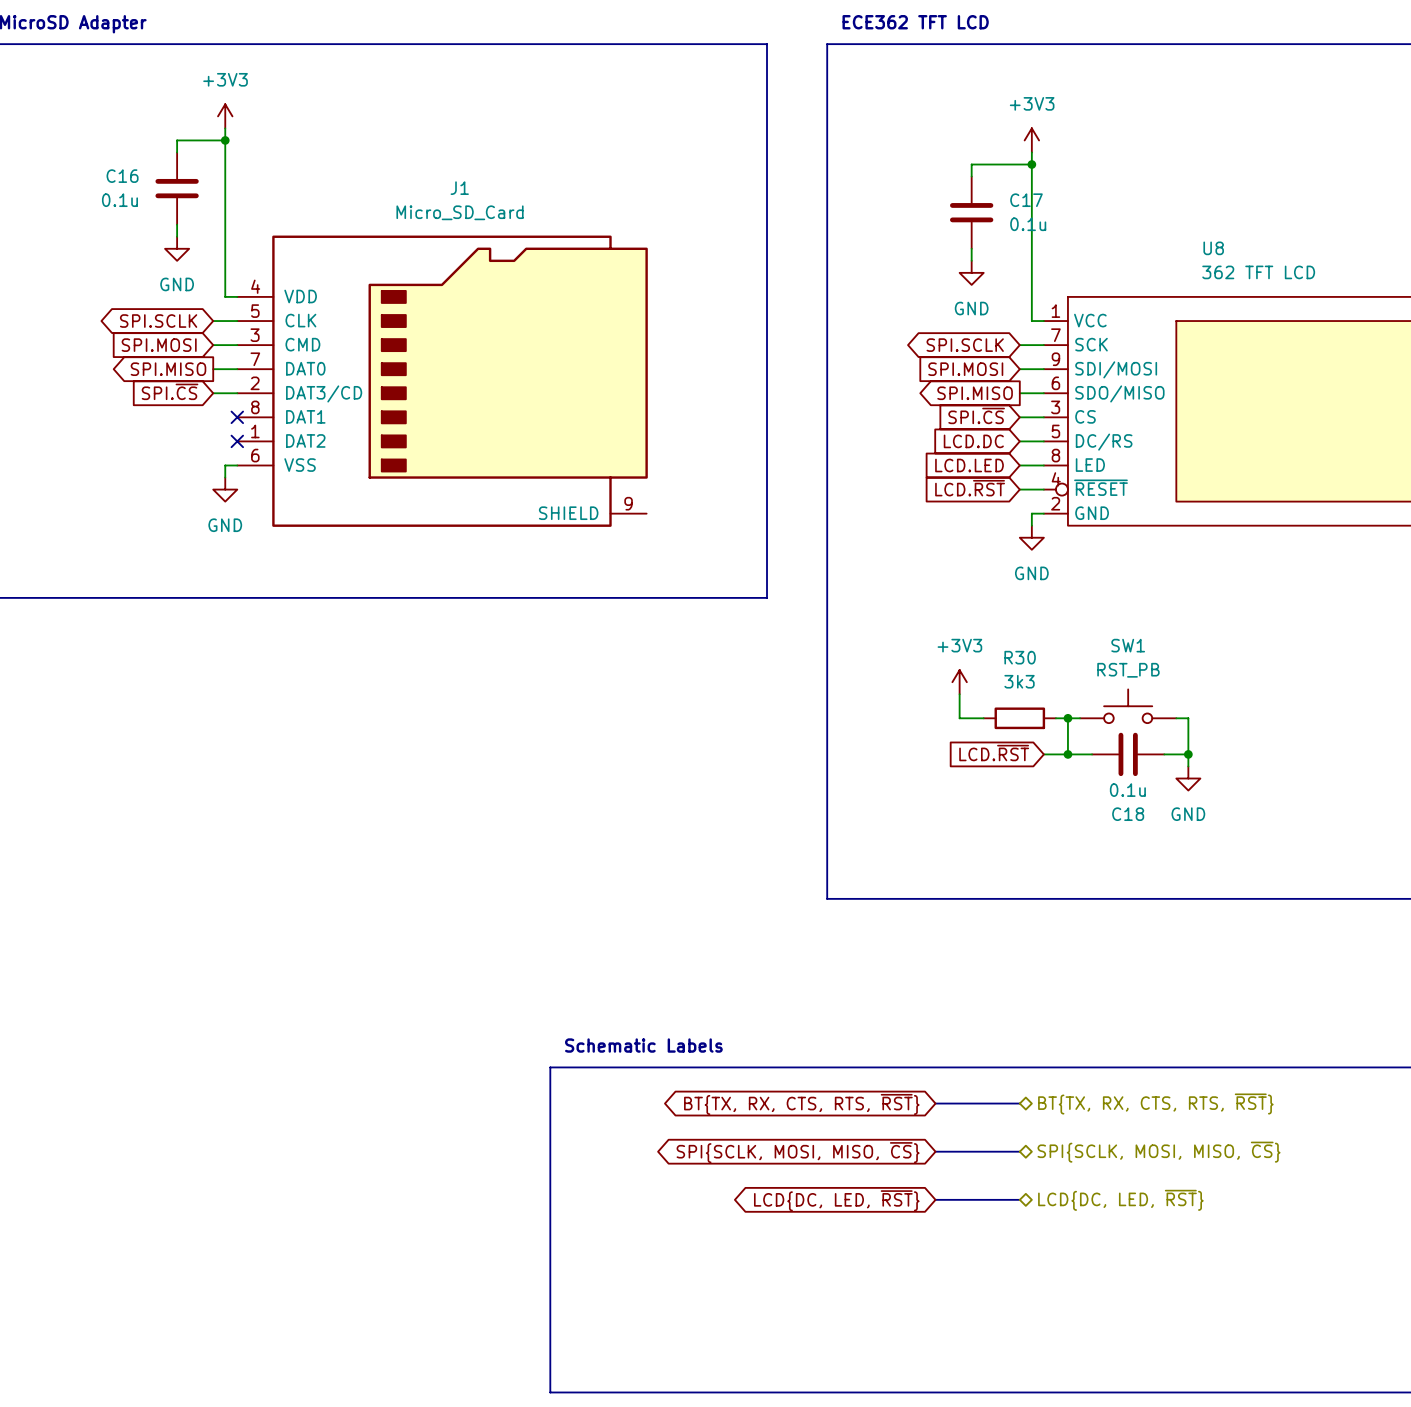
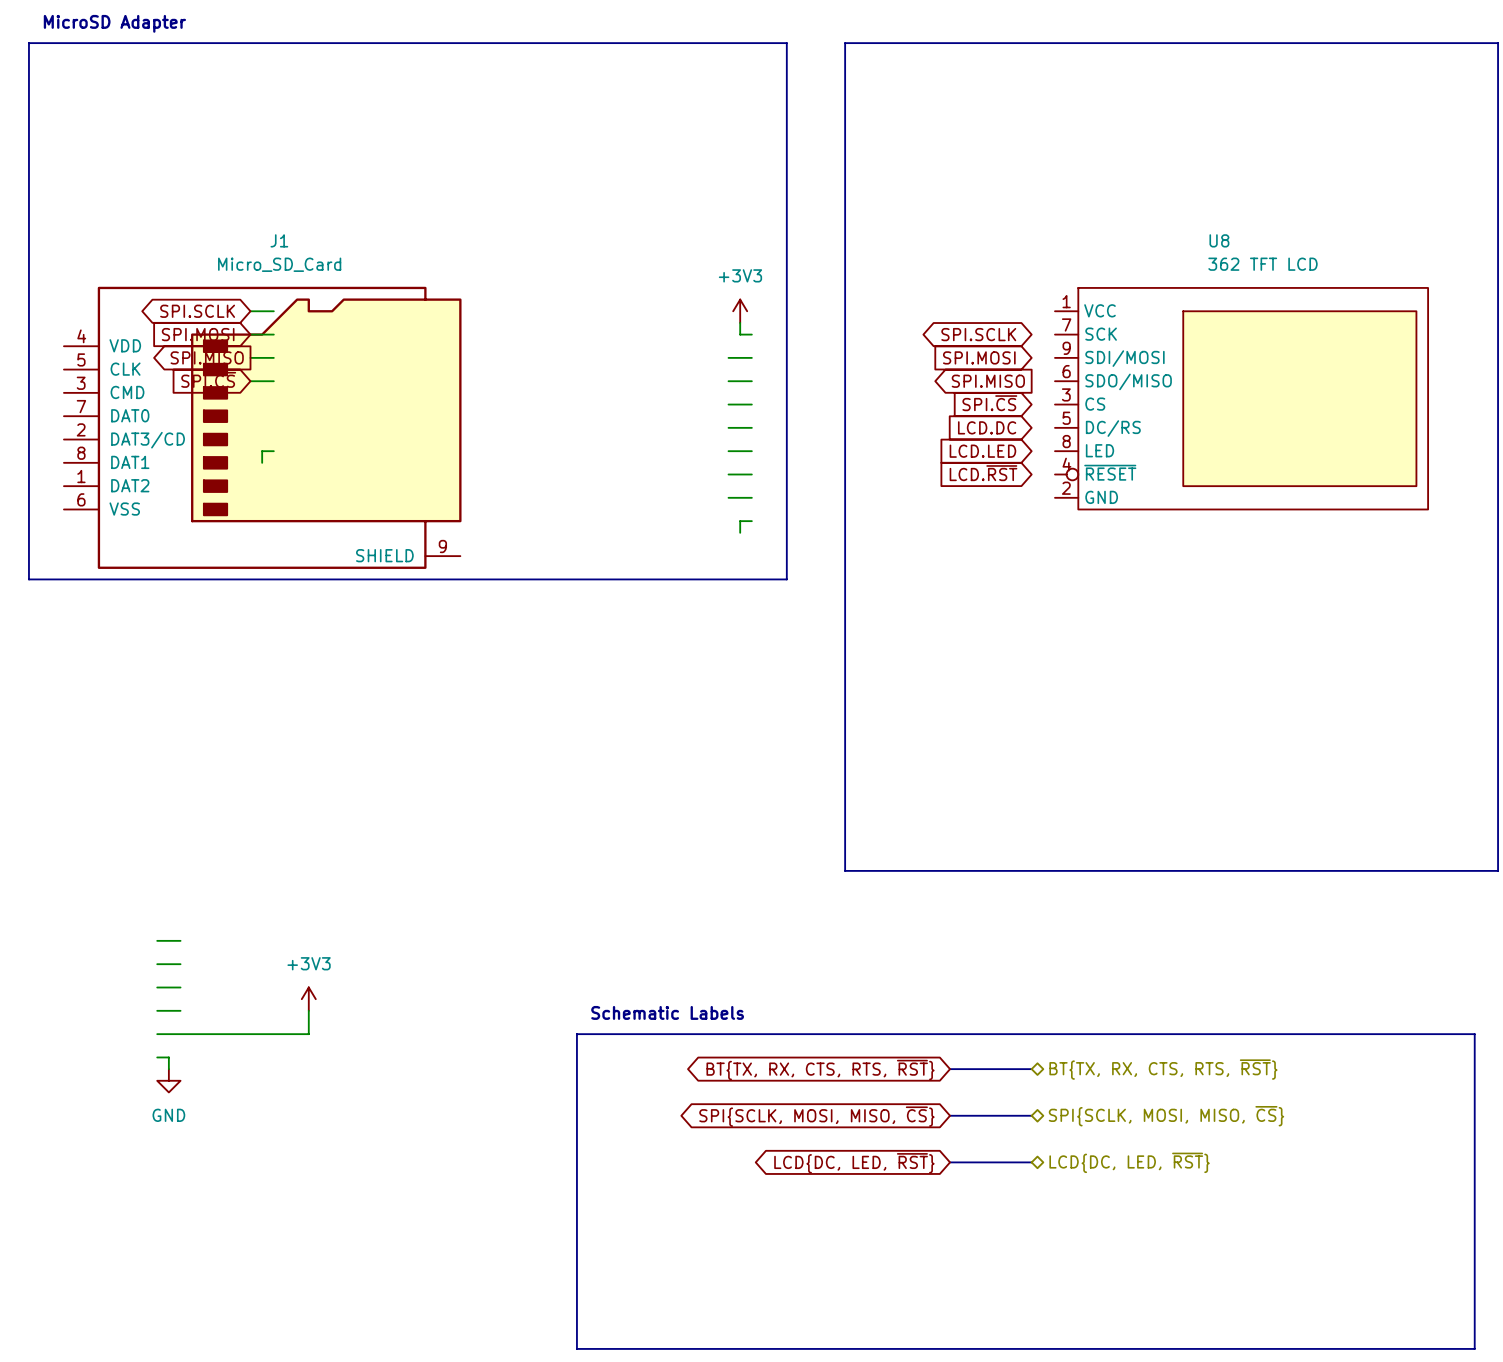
text: ECE362 TFT LCD (915, 22) -> none
power symbol: +3V3 (225, 116) -> none
wire: (225, 128) (225, 296) (237, 296) -> none
wire: (225, 140) (177, 140) (177, 152) -> none
junction: (225, 140) -> none
power symbol: +3V3 (1031, 140) -> none
wire: (1031, 152) (1031, 321) (1043, 321) -> none
wire: (1031, 164) (971, 164) (971, 176) -> none
junction: (1031, 164) -> none
C16: 0.1u (177, 188) -> none
C17: 0.1u (971, 212) -> none
wire: (177, 224) (177, 236) -> none
power symbol: GND (177, 248) -> none
wire: (971, 248) (971, 260) -> none
power symbol: GND (971, 272) -> none
power symbol: none -> +3V3 (740, 311)
wire: none -> (740, 322) (740, 334) (751, 334)
wire: (1019, 345) (1043, 345) -> none
wire: none -> (728, 357) (751, 357)
wire: (1019, 369) (1043, 369) -> none
J1 position: (442, 381) -> (262, 427)
wire: none -> (728, 381) (751, 381)
wire: (1019, 393) (1043, 393) -> none
no-connect mark: (237, 417) -> none
wire: none -> (728, 404) (751, 404)
wire: (1019, 417) (1043, 417) -> none
no-connect mark: (237, 441) -> none
wire: none -> (728, 427) (751, 427)
wire: (1019, 441) (1043, 441) -> none
wire: none -> (728, 451) (751, 451)
wire: (1019, 465) (1043, 465) -> none
power symbol: GND (225, 489) -> none
wire: none -> (728, 474) (751, 474)
wire: (1019, 489) (1043, 489) -> none
wire: none -> (728, 497) (751, 497)
wire: (1043, 513) (1031, 513) (1031, 525) -> none
wire: none -> (751, 521) (740, 521) (740, 532)
power symbol: GND (1031, 537) -> none
power symbol: +3V3 (959, 682) -> none
wire: (959, 694) (959, 718) (983, 718) -> none
SW1: RST_PB (1128, 706) -> none
R30: 3k3 (1019, 718) -> none
wire: (1055, 718) (1080, 718) -> none
wire: (1067, 718) (1067, 754) -> none
junction: (1067, 718) -> none
wire: (1176, 718) (1188, 718) (1188, 766) -> none
global label: LCD.~{RST} (994, 753) -> none
wire: (1043, 754) (1092, 754) -> none
junction: (1067, 754) -> none
C18: 0.1u (1128, 754) -> none
wire: (1164, 754) (1188, 754) -> none
junction: (1188, 754) -> none
power symbol: GND (1188, 778) -> none
wire: none -> (157, 940) (180, 940)
wire: none -> (157, 964) (180, 964)
wire: none -> (157, 987) (180, 987)
power symbol: none -> +3V3 (308, 999)
wire: none -> (157, 1010) (180, 1010)
wire: none -> (308, 1010) (308, 1034) (157, 1034)
wire: none -> (157, 1057) (168, 1057) (168, 1069)
power symbol: none -> GND (168, 1080)

